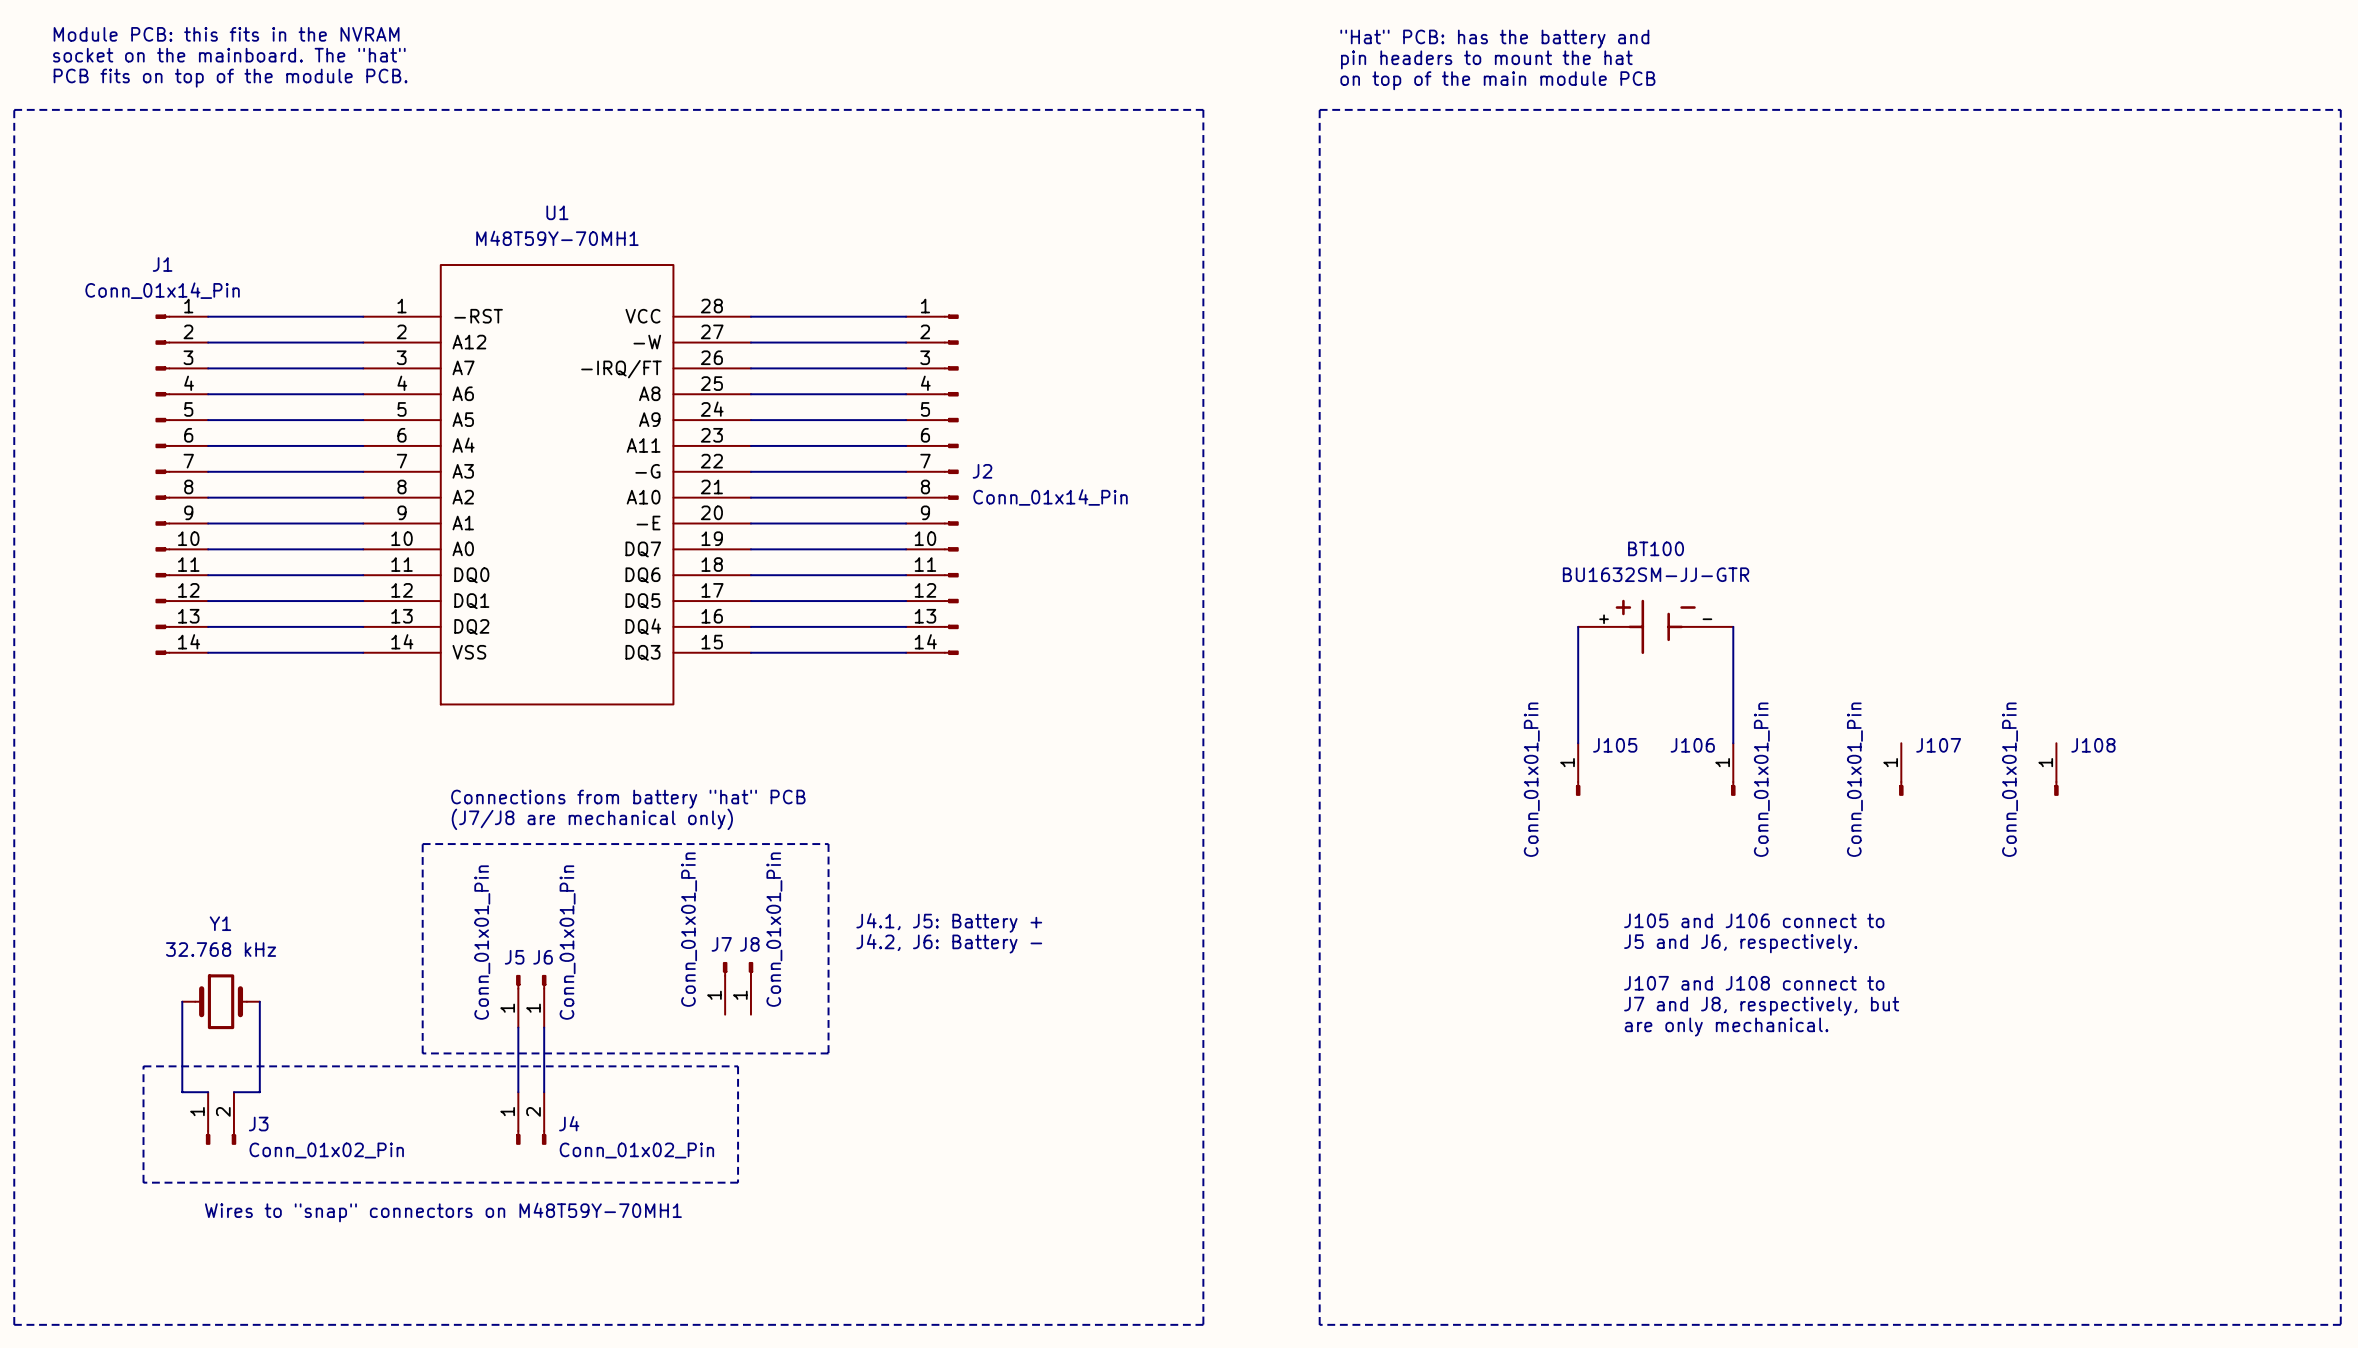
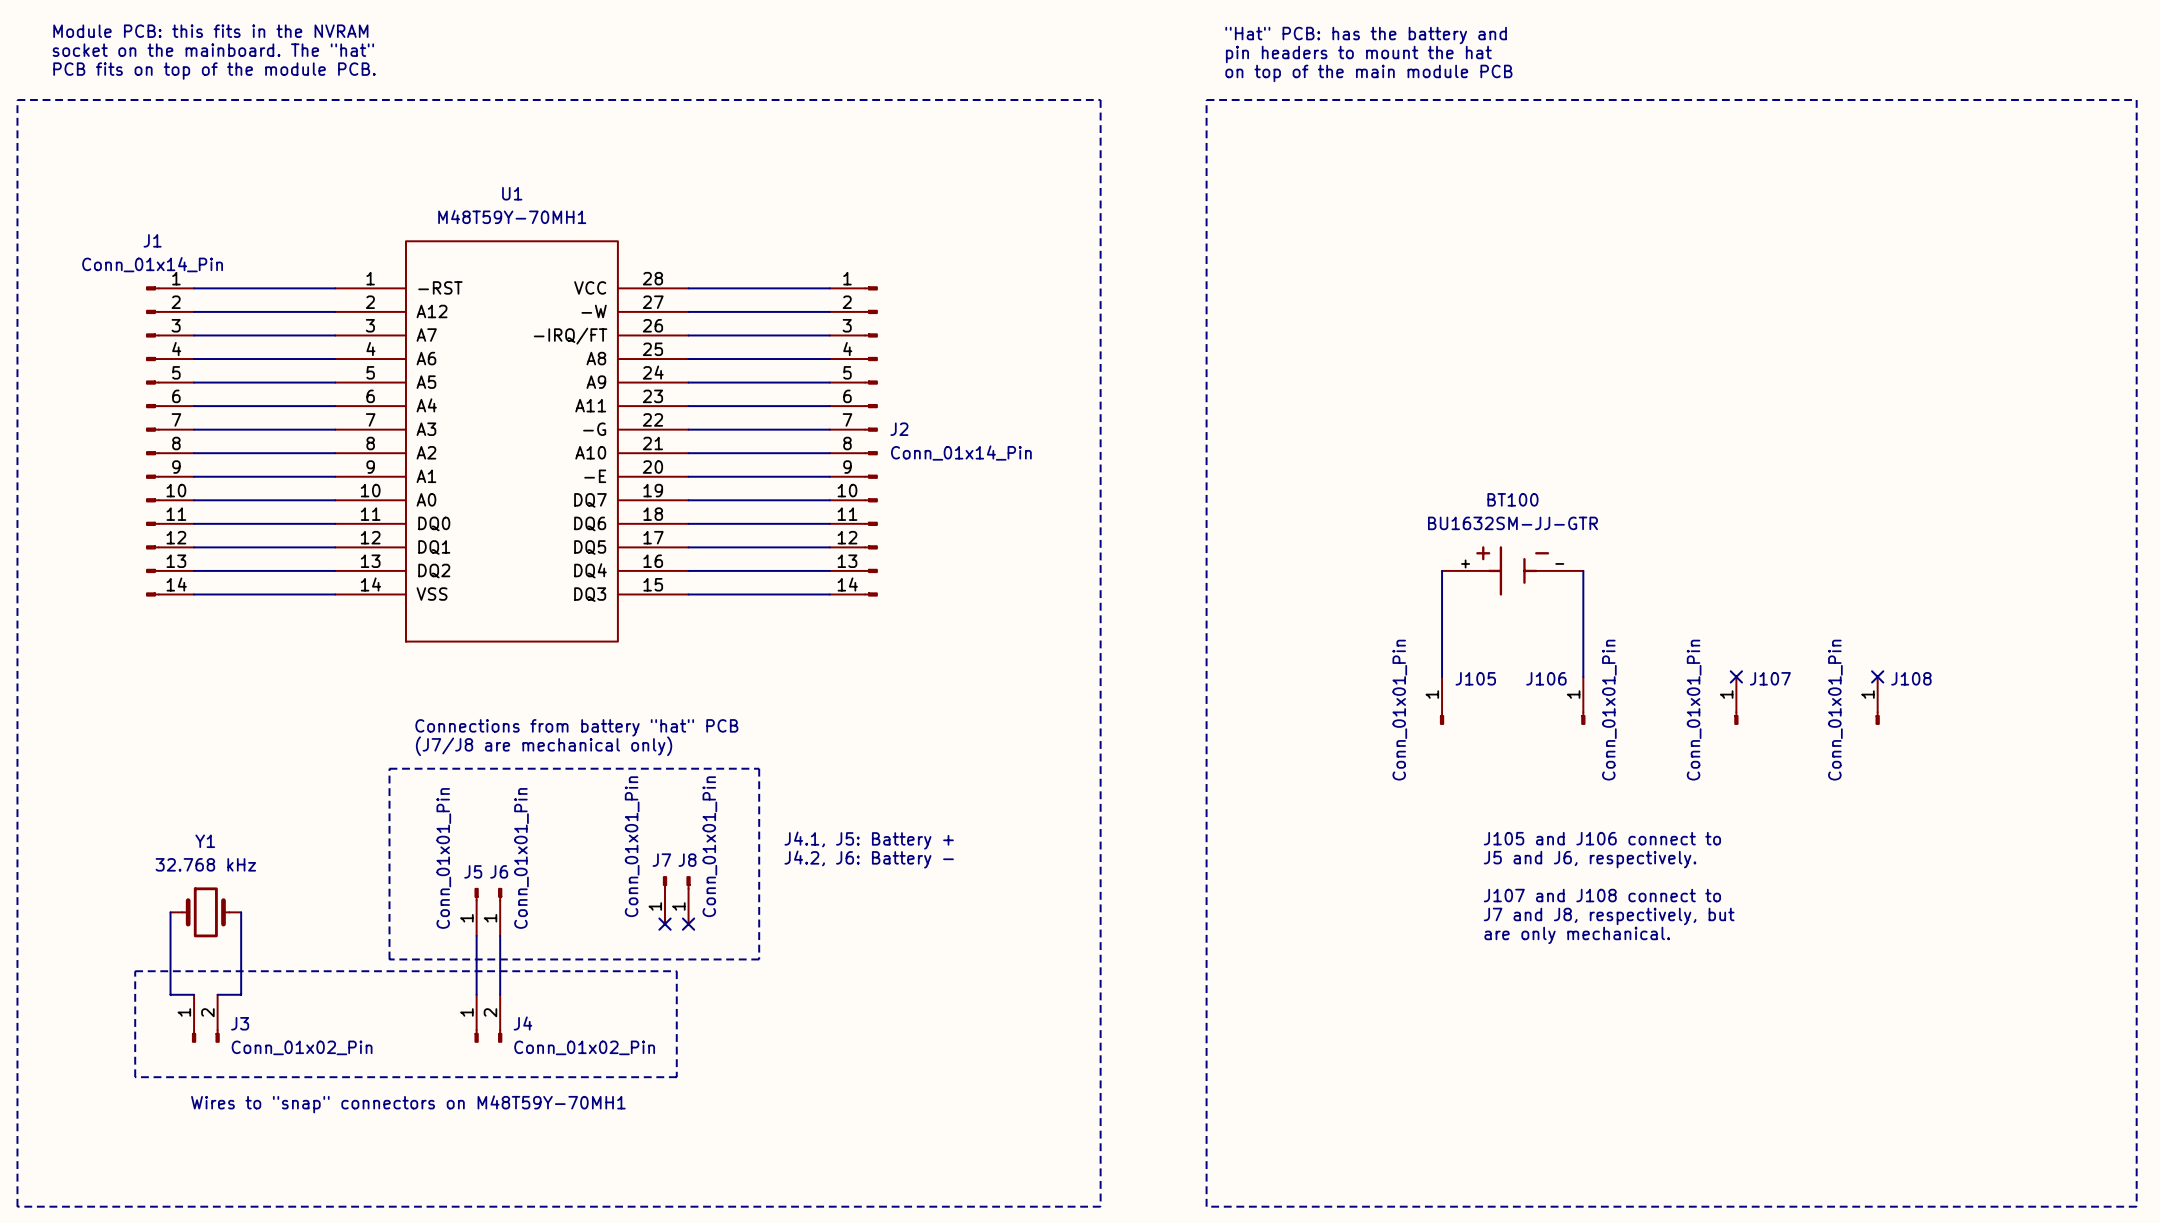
no-connect mark: none -> (1736, 676)
no-connect mark: none -> (1877, 676)
no-connect mark: none -> (665, 924)
no-connect mark: none -> (688, 924)

